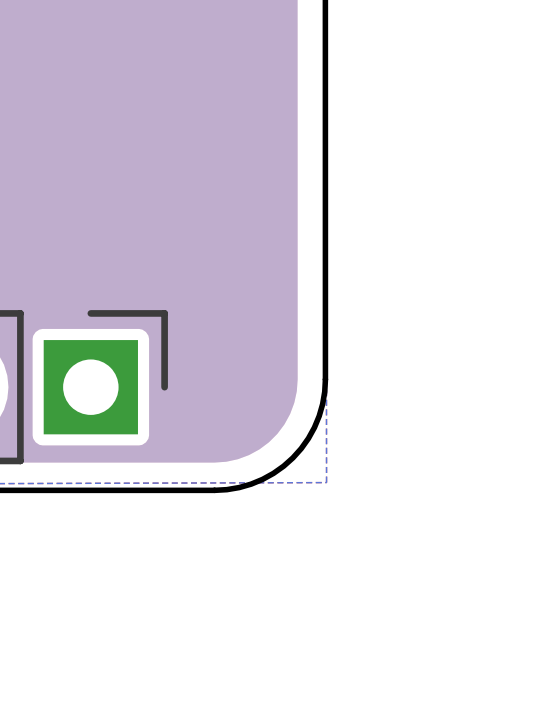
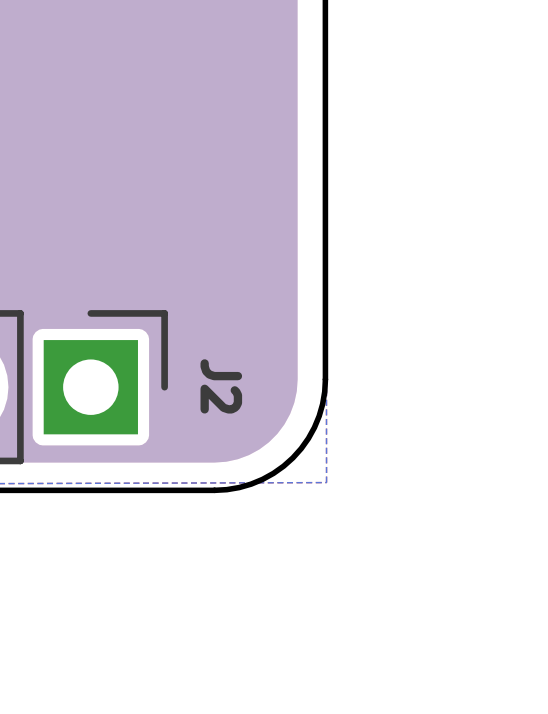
J2 name: none -> J2 (221, 386)

